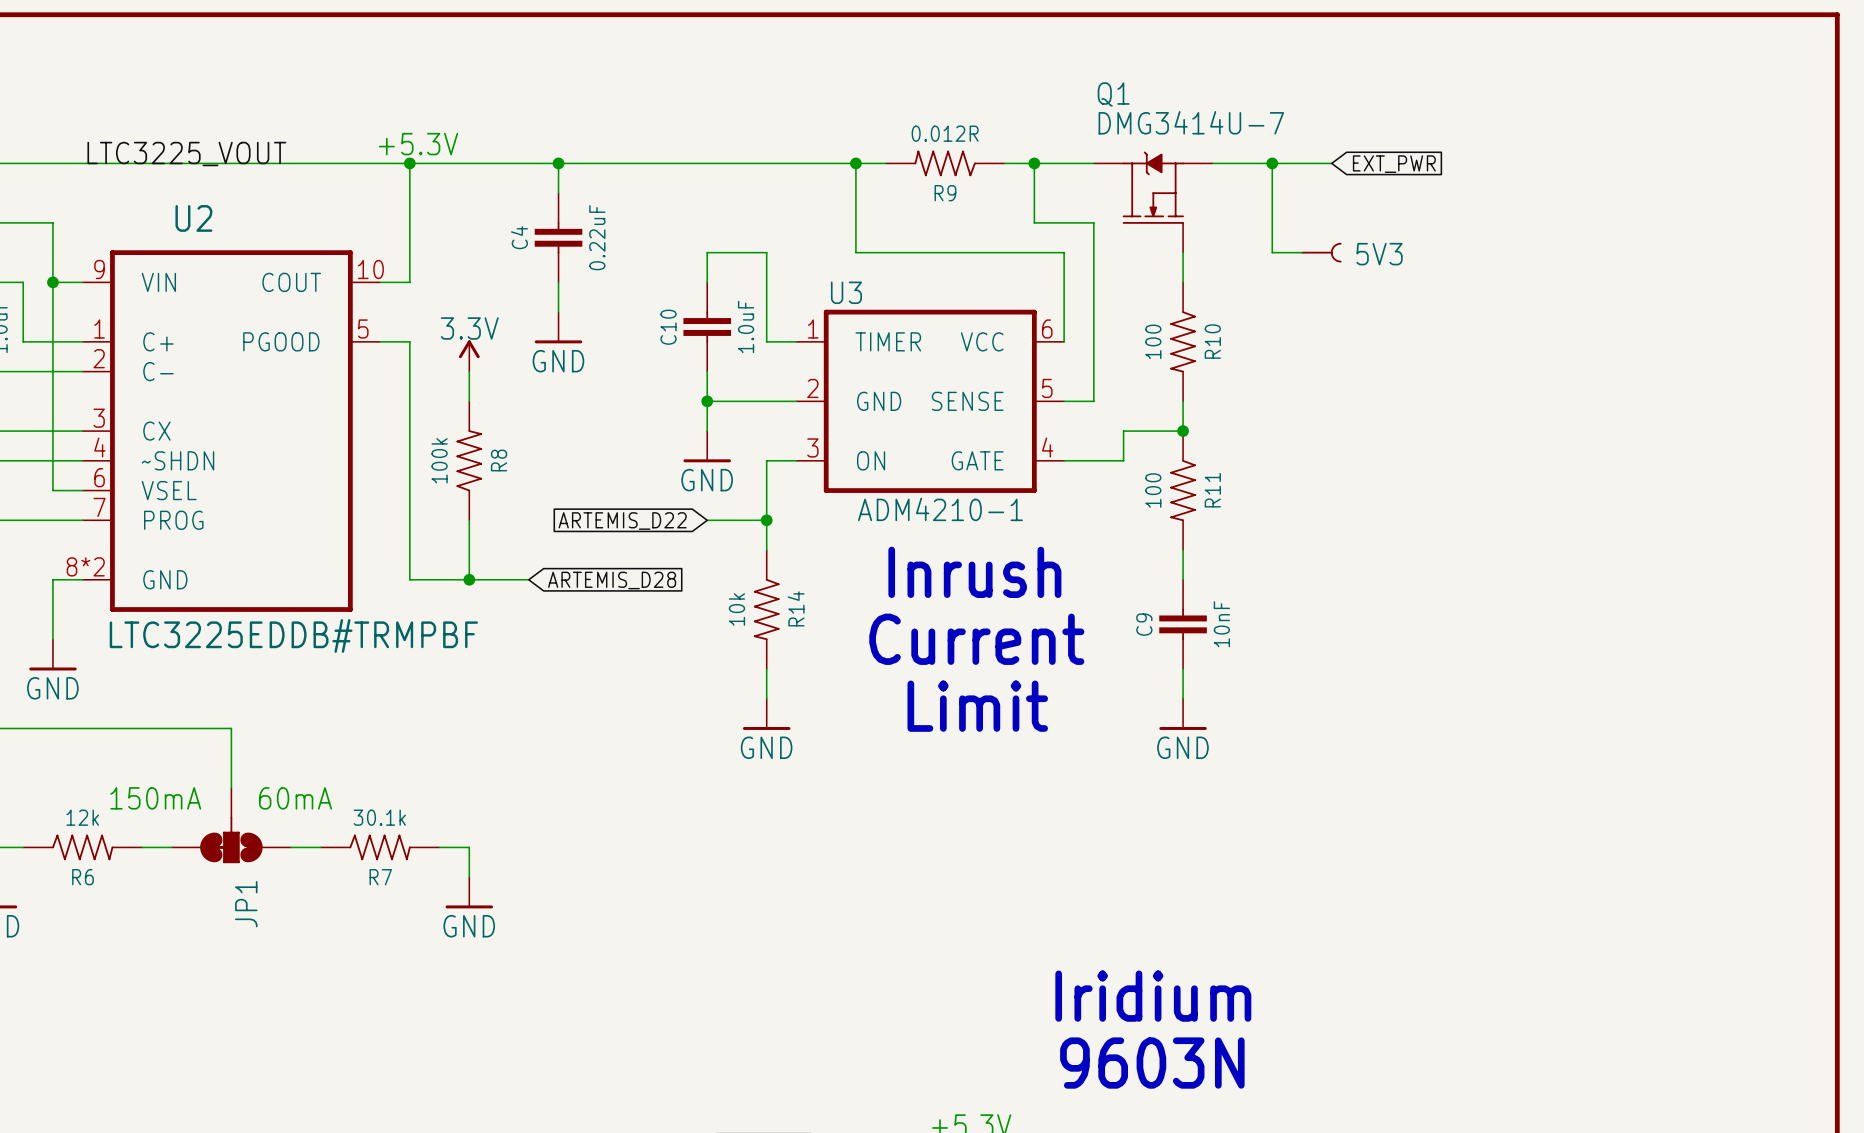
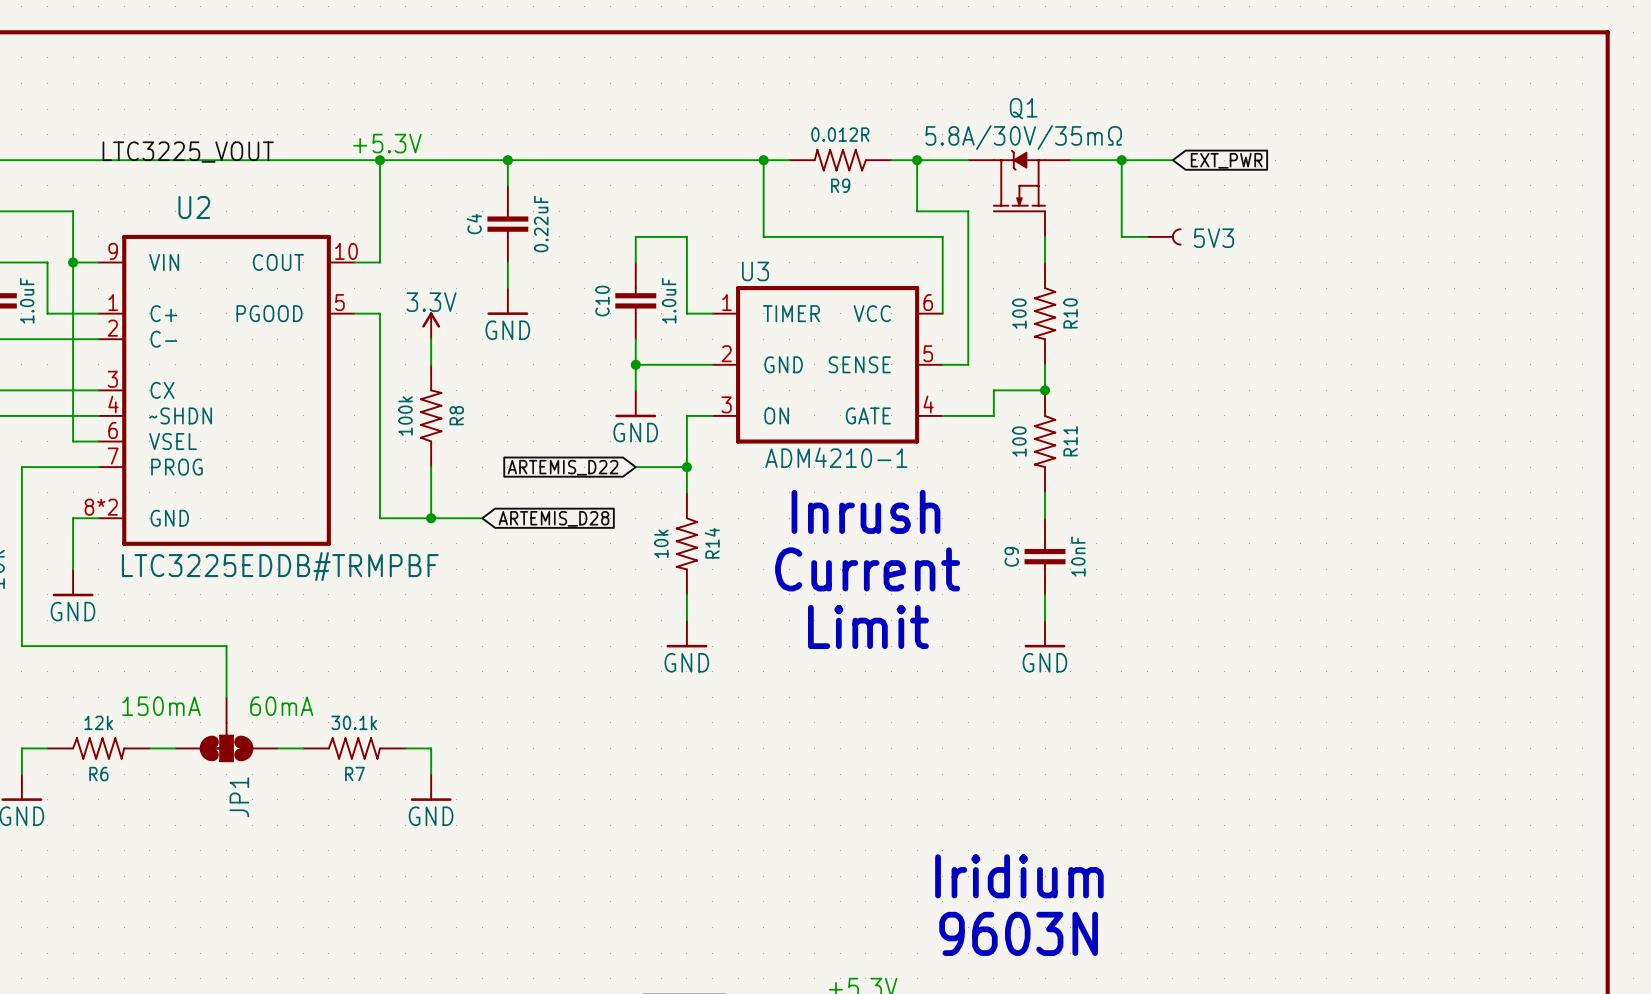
Q1 name position: Q1 (1113, 94) -> Q1 (1023, 108)
Q1 value: DMG3414U-7 (1191, 122) -> 5.8A/30V/35mΩ (1023, 137)

